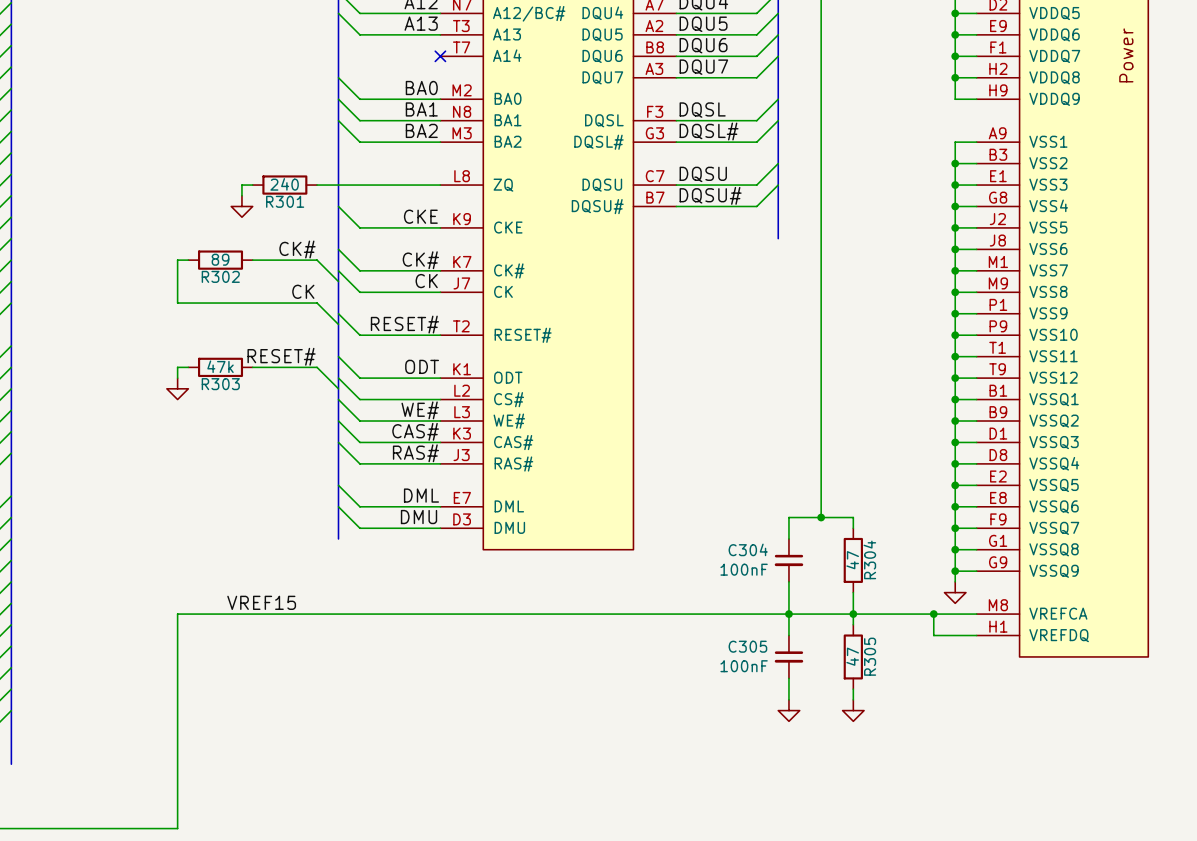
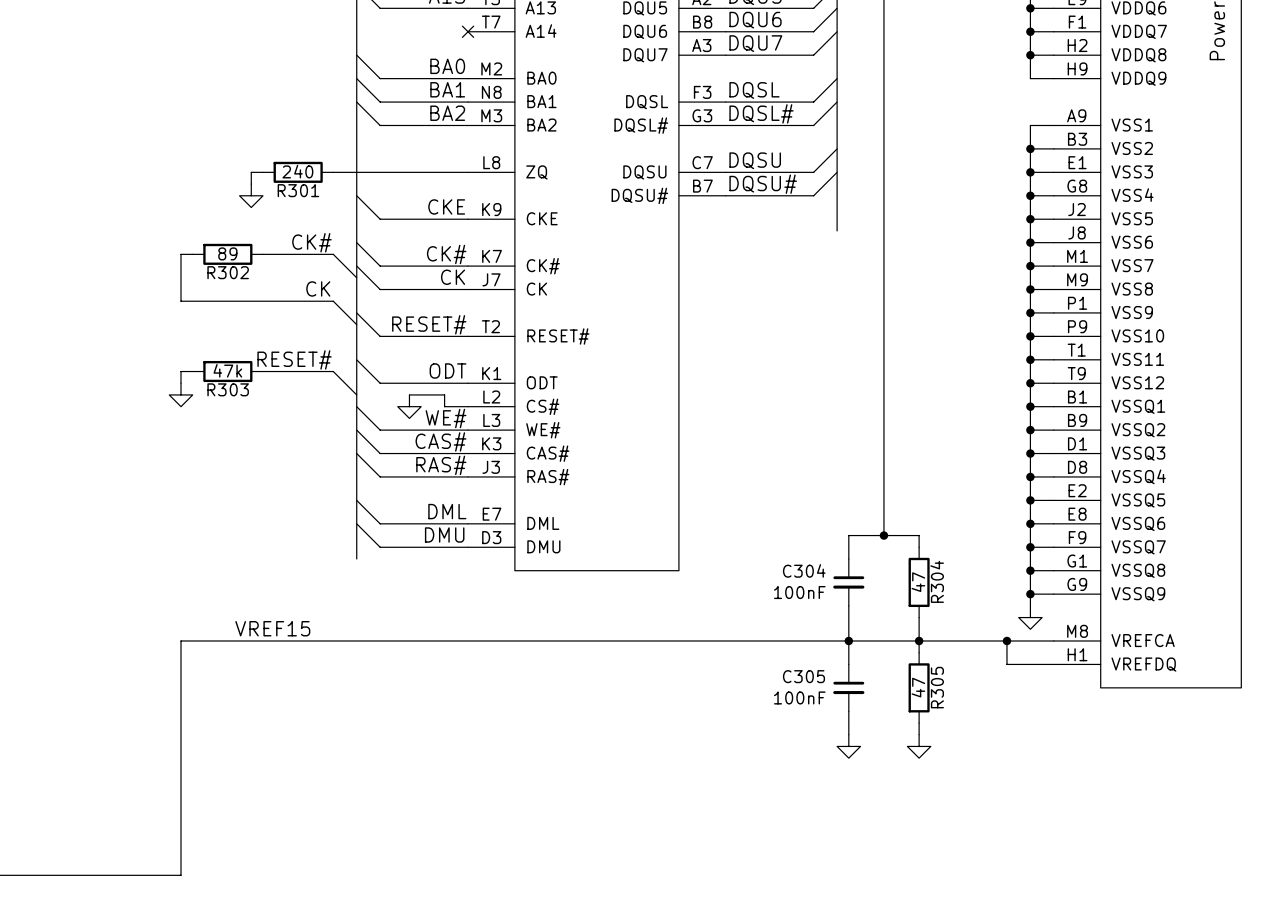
wire: (338, 378) (359, 399) (418, 399) -> (409, 394) (444, 394) (444, 406)
power symbol: none -> (409, 406)

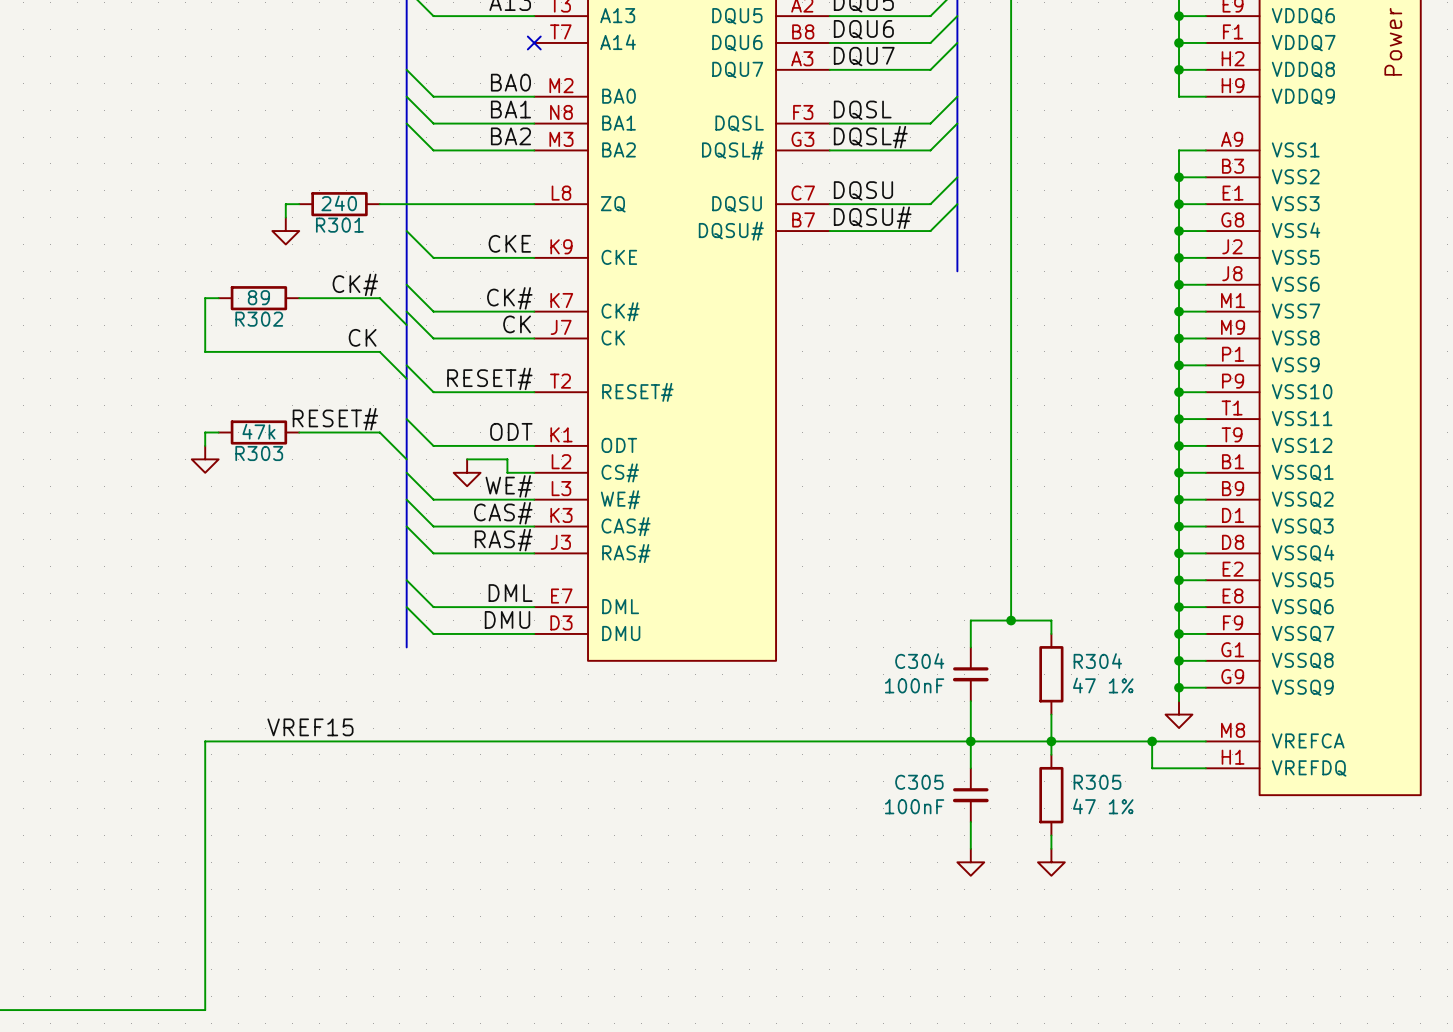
R304 name rotation: 0° (937, 581) -> 90° clockwise (1097, 661)
R304 value: 47 (918, 582) -> 47 1% (1103, 685)
R305 value: 47 (918, 687) -> 47 1% (1103, 806)
R305 name rotation: 0° (937, 687) -> 90° clockwise (1097, 782)

